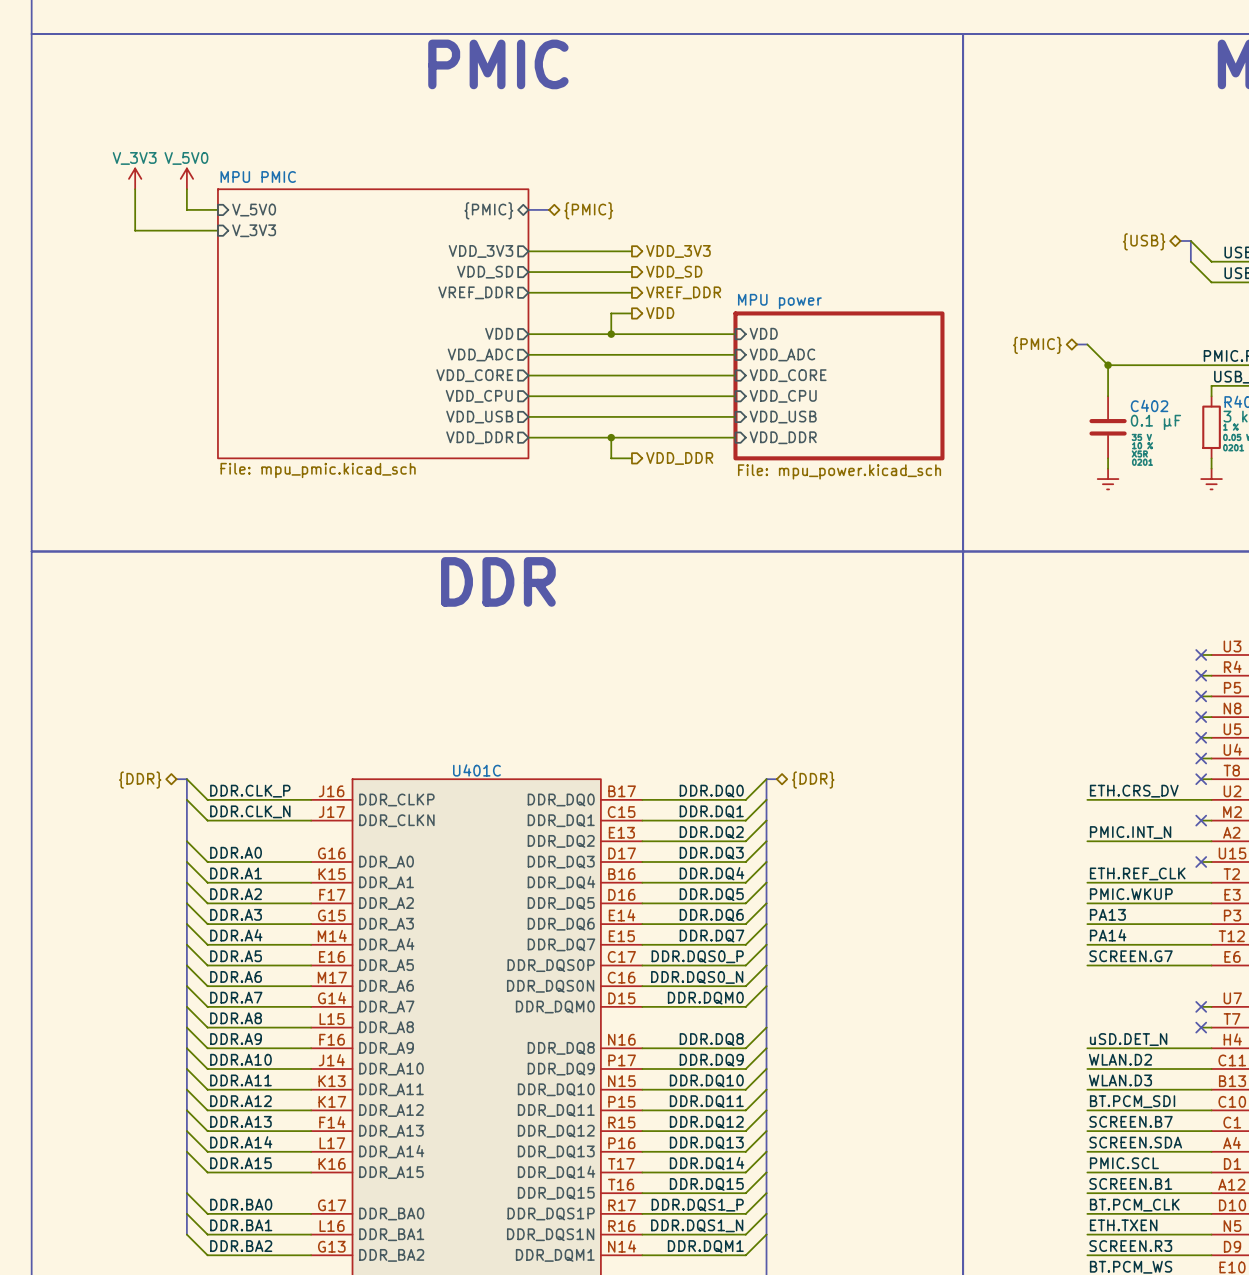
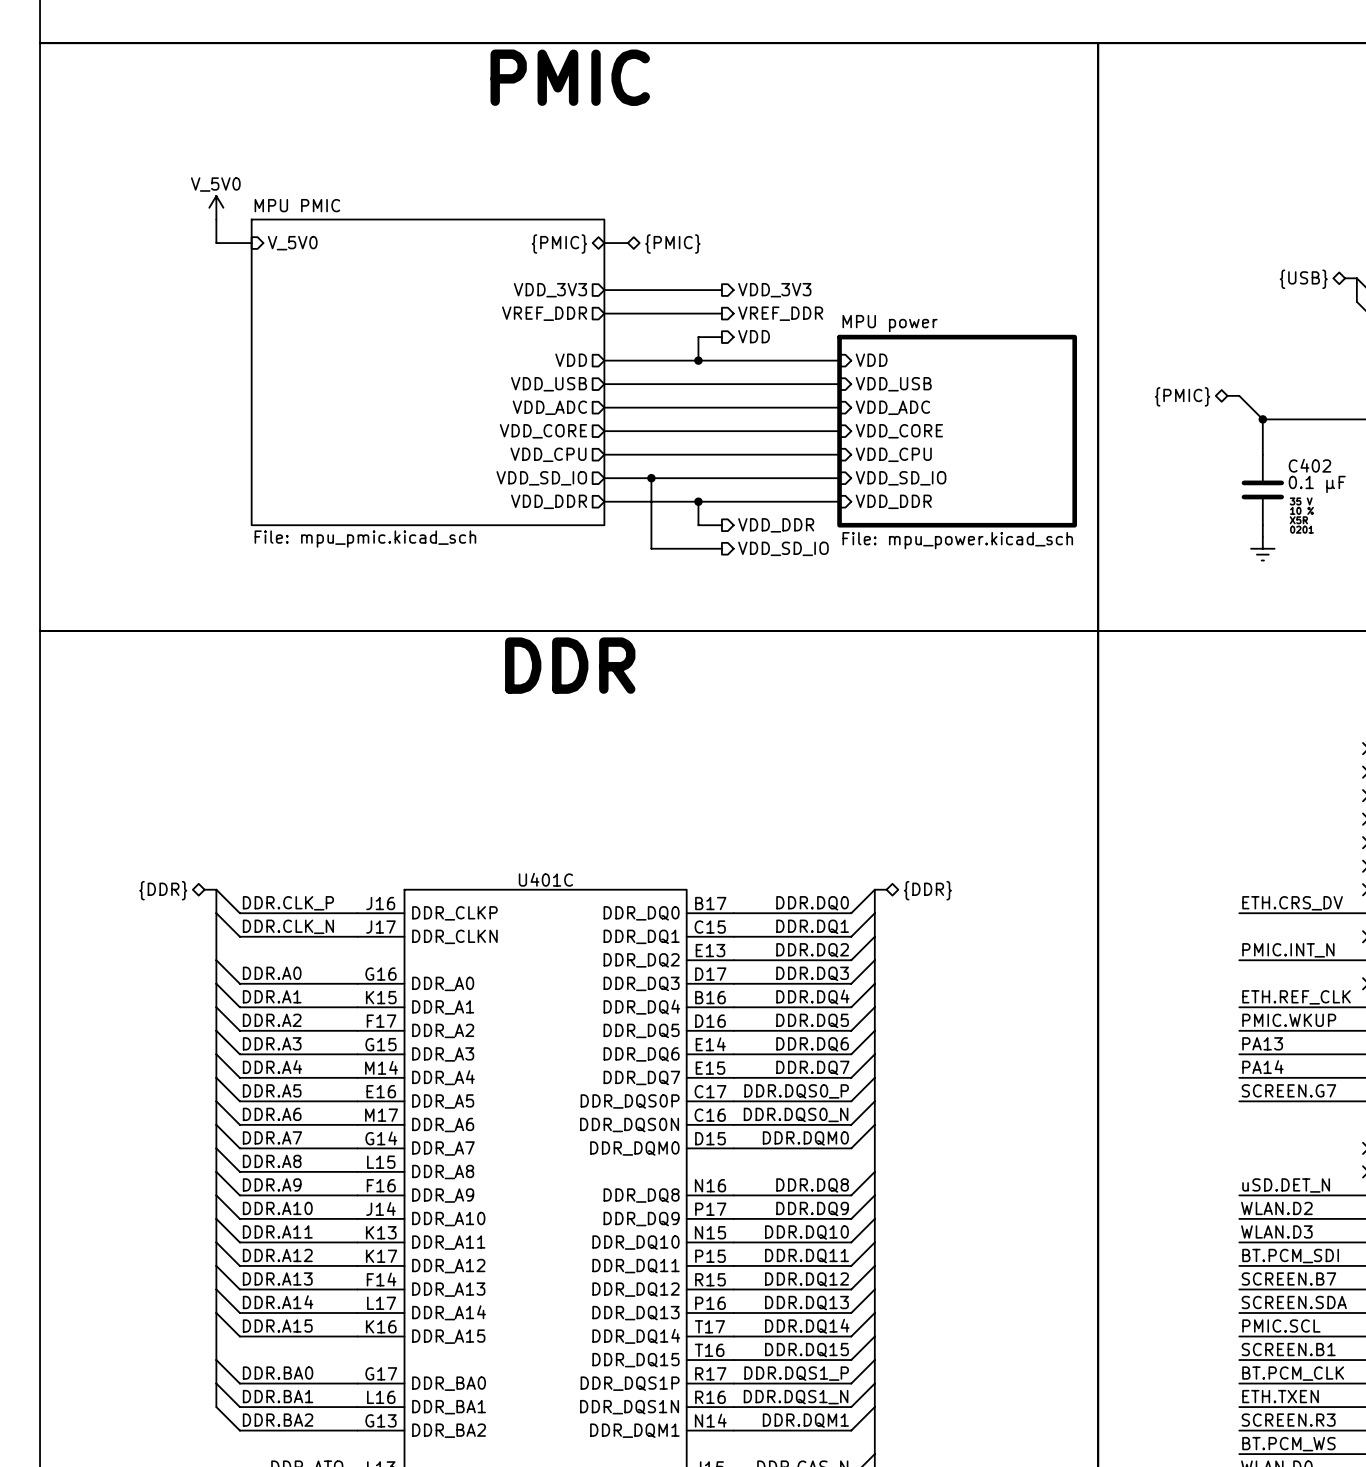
power symbol: V_3V3 (135, 178) -> none
wire: (135, 189) (135, 230) (217, 230) -> none
sheet pin: V_3V3 (254, 230) -> none
sheet pin: VDD_SD (485, 272) -> VREF_DDR (544, 313)
hierarchical label: VDD_SD (674, 272) -> VREF_DDR (780, 313)
sheet pin: VREF_DDR (475, 292) -> none
wire: (528, 292) (611, 292) -> (604, 360) (698, 360) (698, 337)
hierarchical label: VREF_DDR (683, 292) -> VDD (754, 336)
sheet pin: none -> VDD (571, 360)
wire: (611, 313) (611, 334) -> none
wire: none -> (721, 360) (839, 360)
hierarchical label: VDD (660, 313) -> none
sheet pin: none -> VDD (871, 360)
sheet pin: VDD (499, 333) -> VDD_USB (549, 384)
sheet pin: VDD (763, 333) -> VDD_USB (893, 384)
junction position: (611, 334) -> (698, 360)
sheet MPU power: none -> File: mpu_power.kicad_sch (957, 431)
sheet MPU power: File: mpu_power.kicad_sch (838, 385) -> none
wire: none -> (651, 478) (651, 548) (721, 548)
junction: none -> (651, 478)
sheet pin: VDD_USB (479, 417) -> VDD_SD_IO (541, 478)
sheet pin: VDD_USB (783, 417) -> VDD_SD_IO (901, 478)
hierarchical label: none -> VDD_SD_IO (783, 548)

